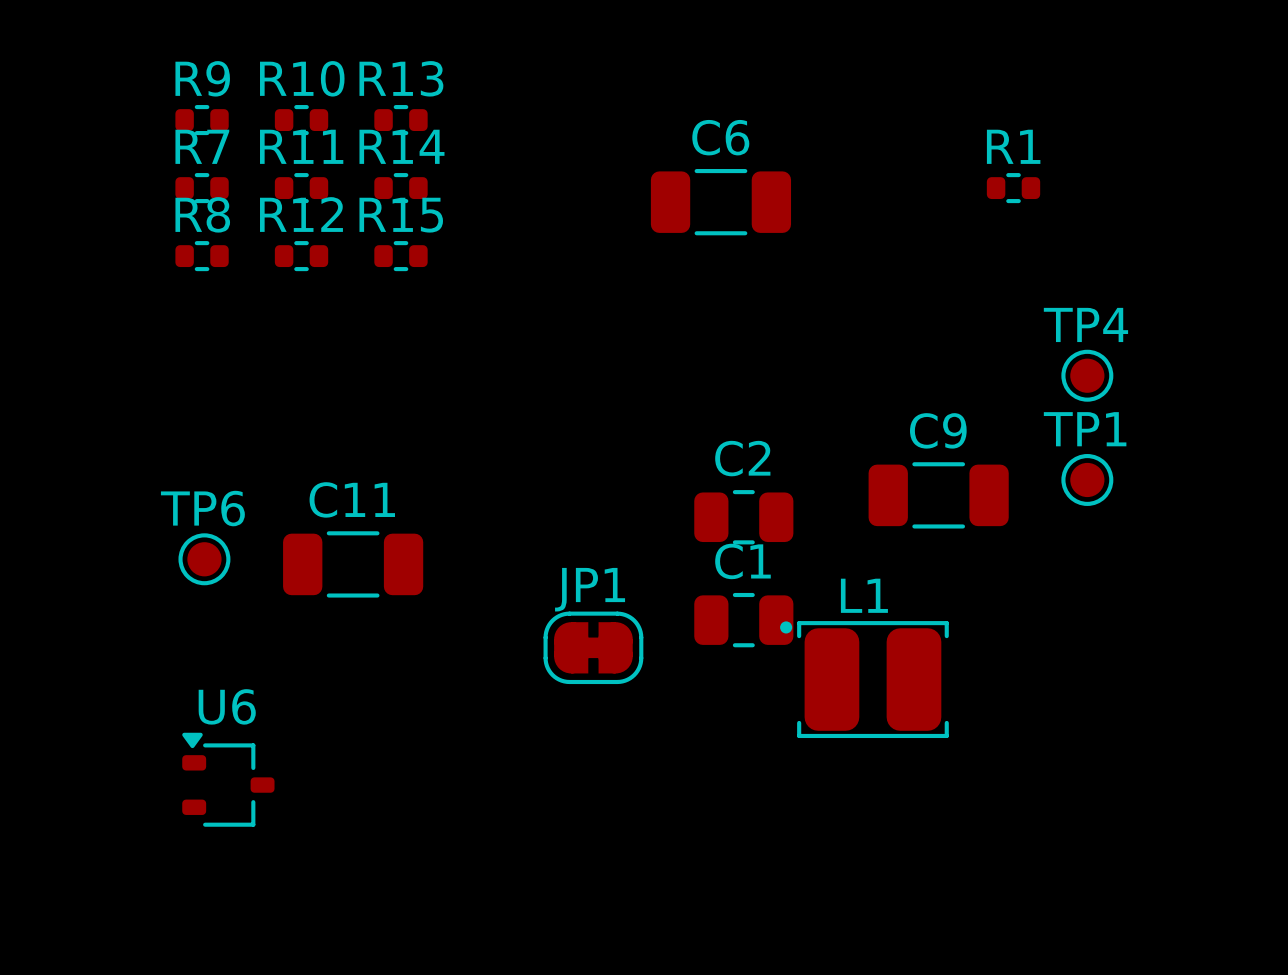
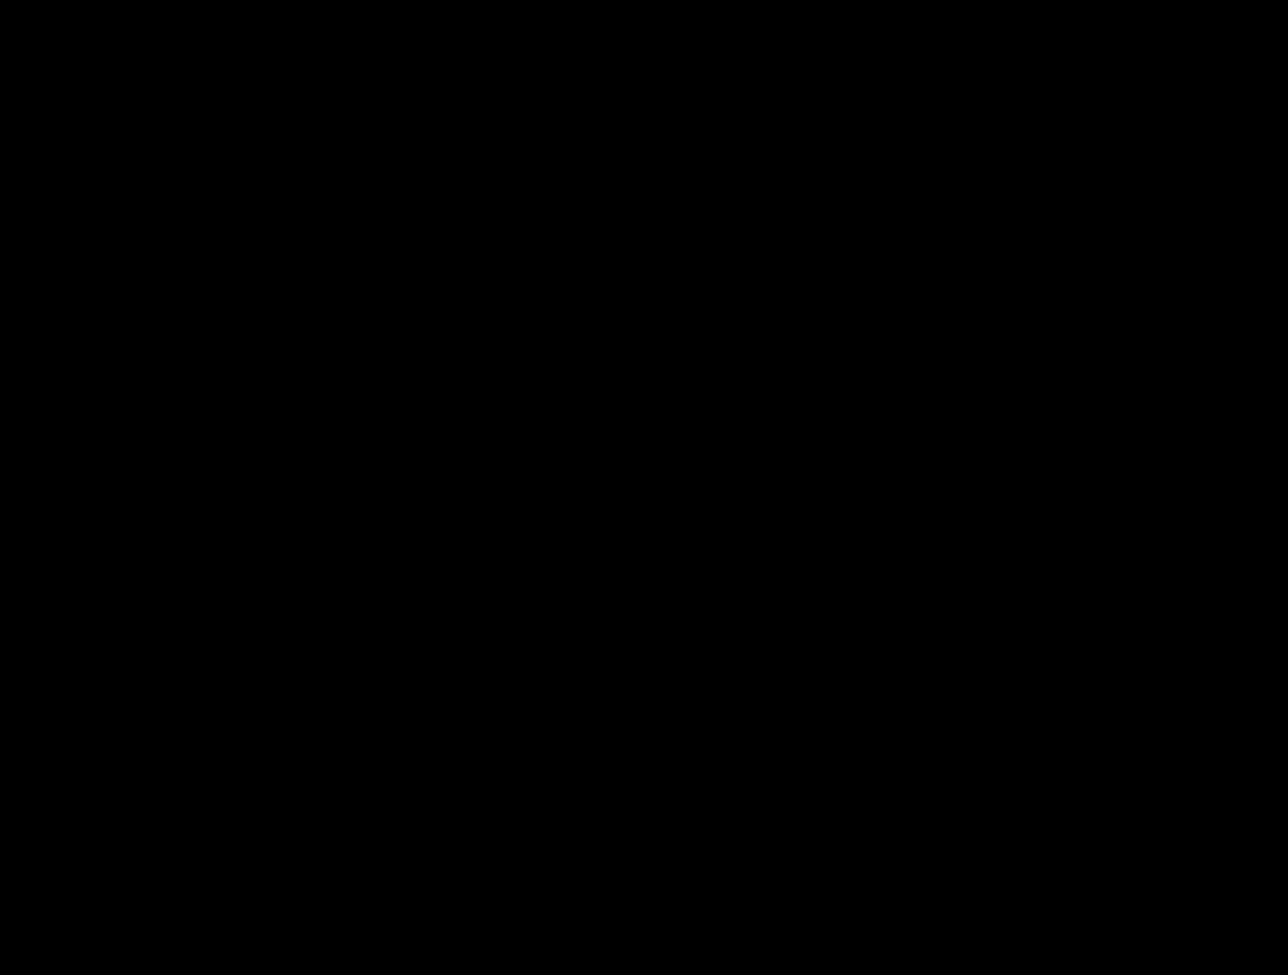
R9: (202, 120) -> none
R10: (301, 120) -> none
R13: (400, 120) -> none
R7: (202, 188) -> none
R11: (301, 188) -> none
R14: (400, 188) -> none
R1: (1013, 188) -> none
C6: (720, 202) -> none
R8: (202, 256) -> none
R12: (301, 256) -> none
R15: (400, 256) -> none
TP4: (1087, 375) -> none
TP1: (1087, 479) -> none
C9: (938, 495) -> none
C2: (743, 517) -> none
TP6: (204, 559) -> none
C11: (353, 564) -> none
C1: (743, 620) -> none
JP1: (593, 647) -> none
L1: (864, 679) -> none
U6: (228, 779) -> none

